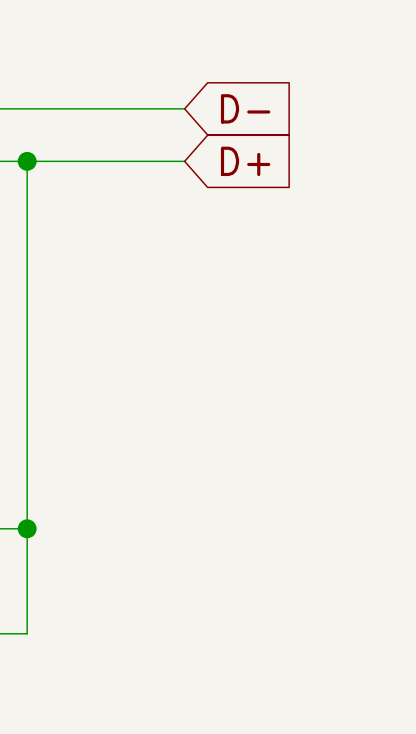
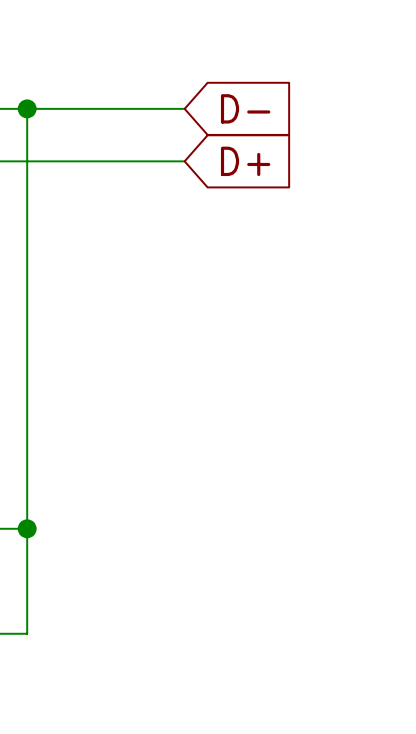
wire: none -> (27, 108) (27, 161)
junction position: (27, 161) -> (27, 108)

